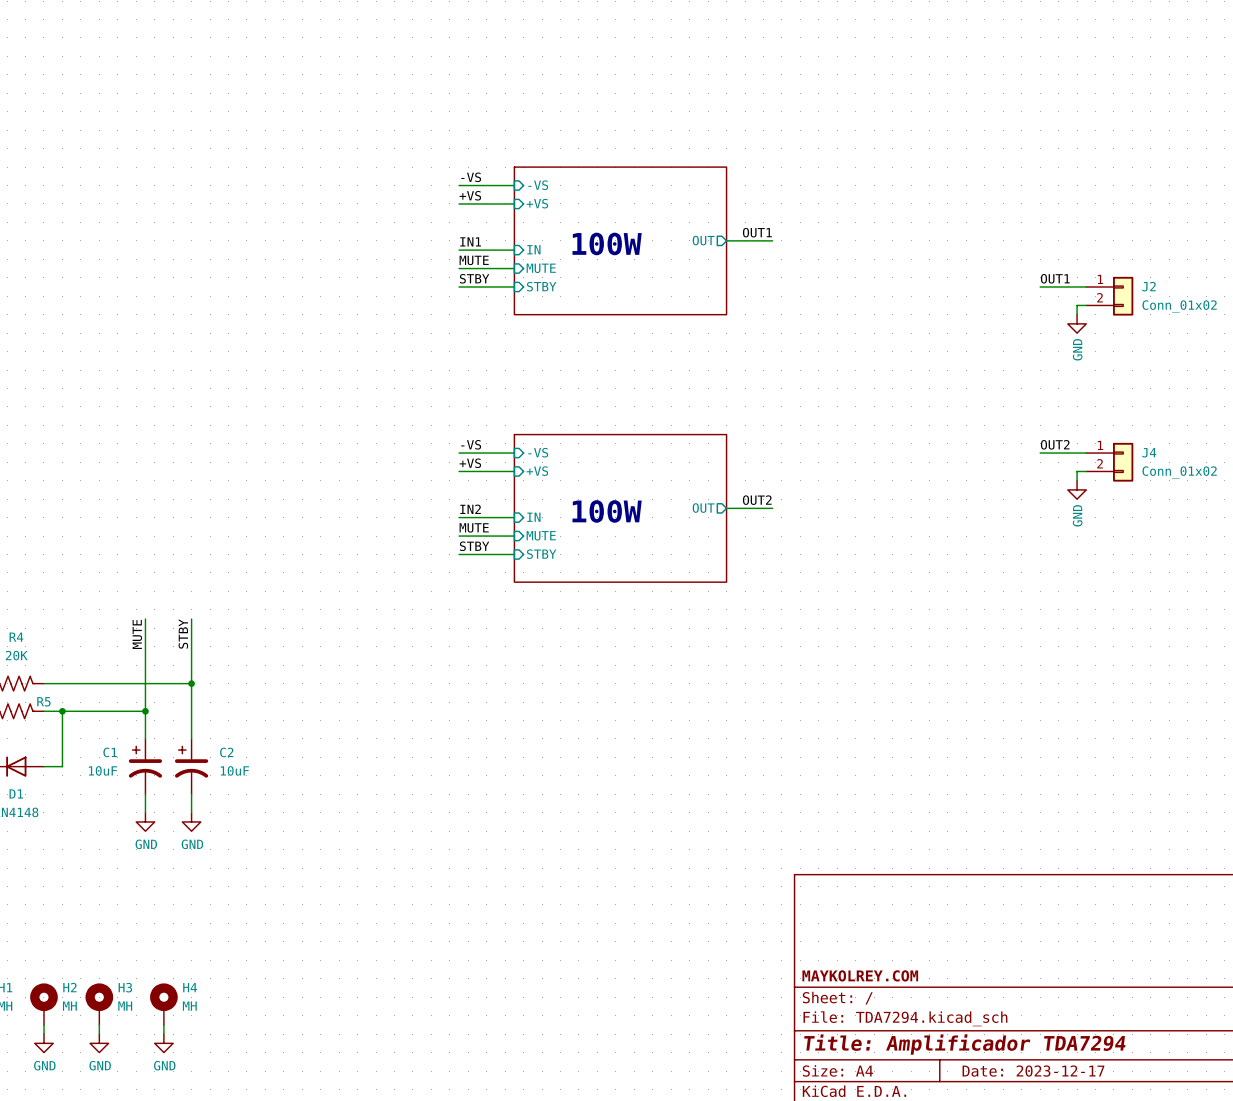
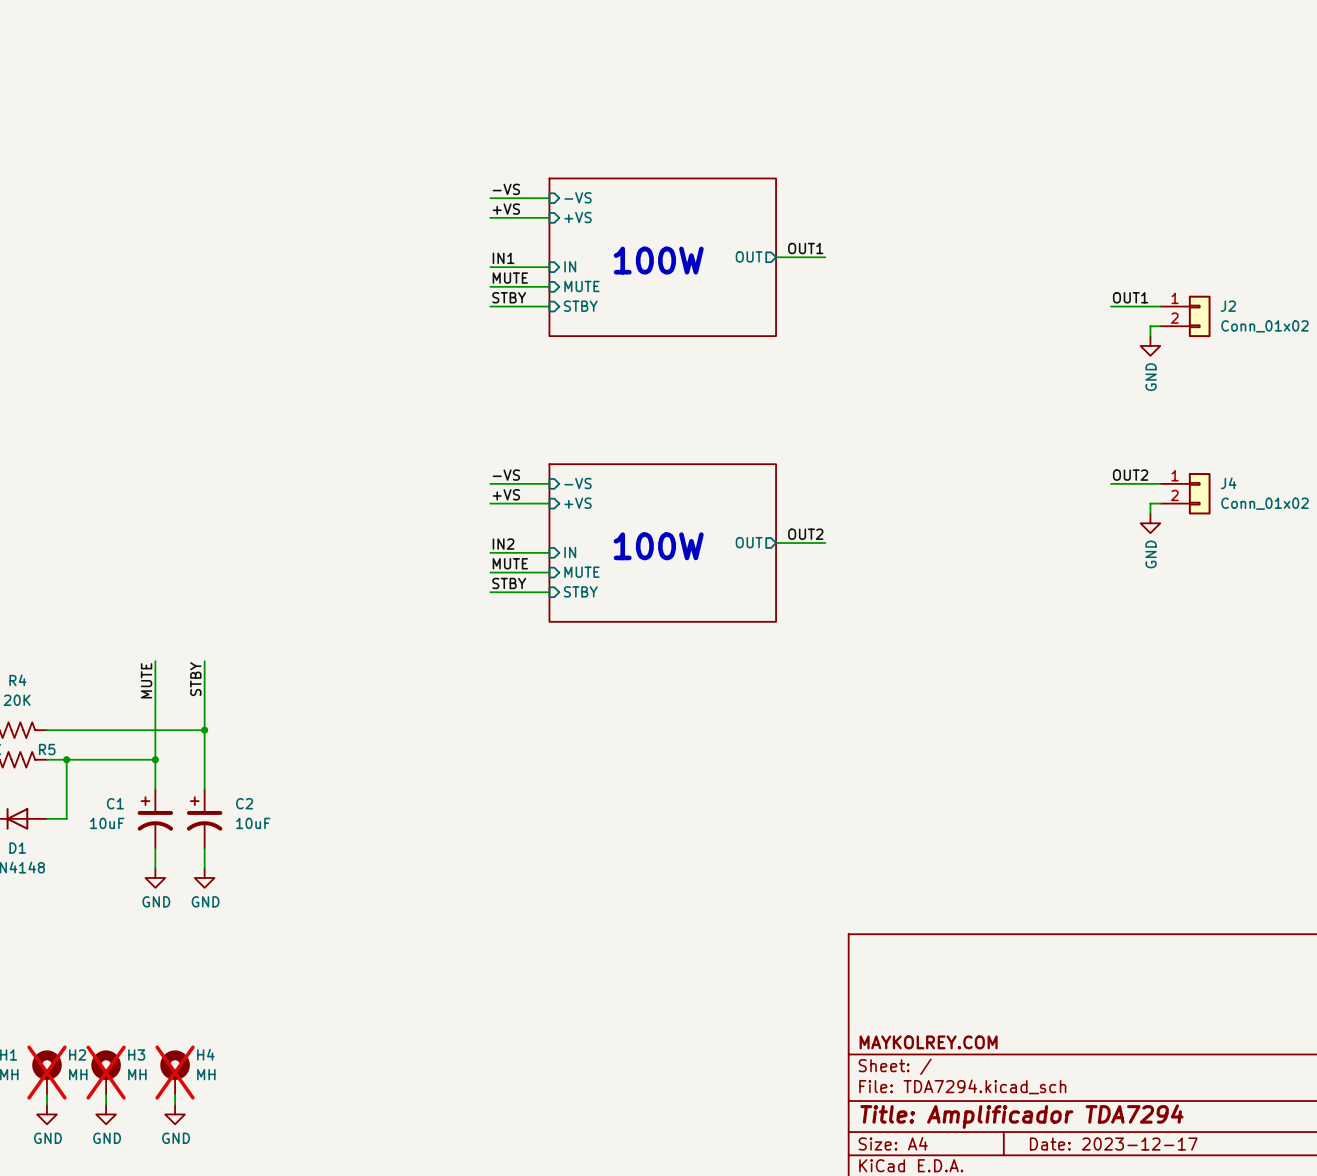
H2 do-not-place cross: none -> (46, 1072)
H3 do-not-place cross: none -> (106, 1072)
H4 do-not-place cross: none -> (175, 1072)

